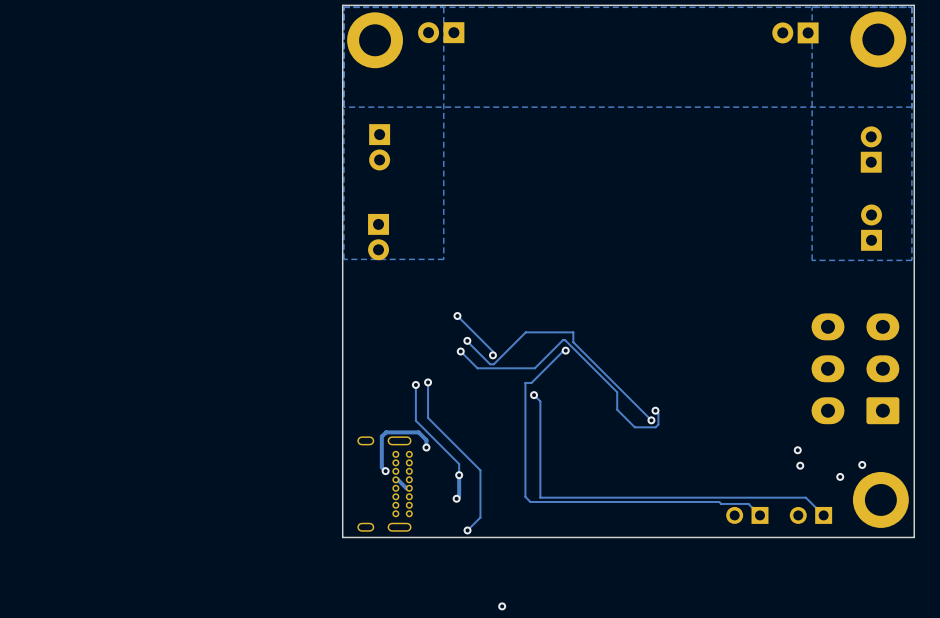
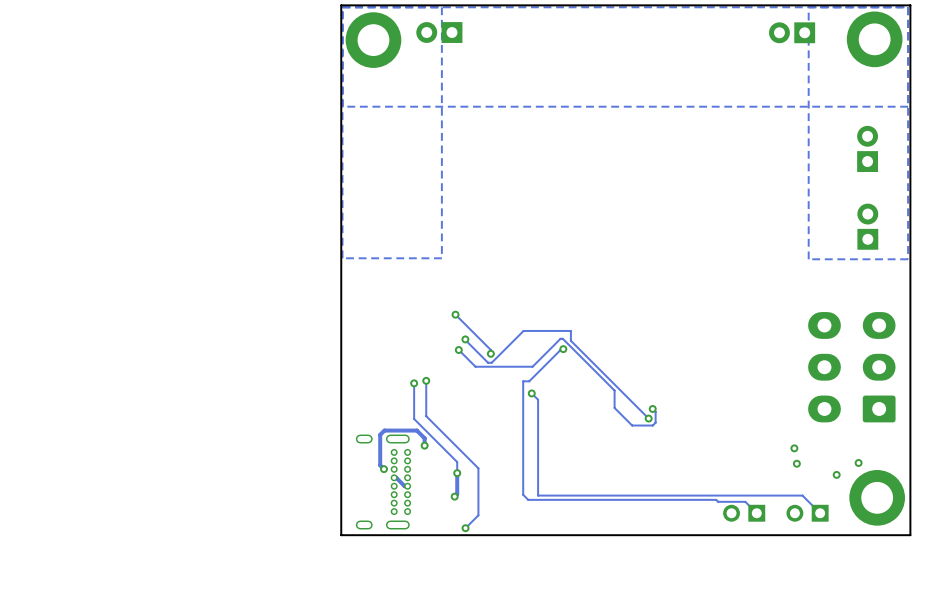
part: (379, 147) -> none
part: (378, 237) -> none
via: (502, 606) -> none

